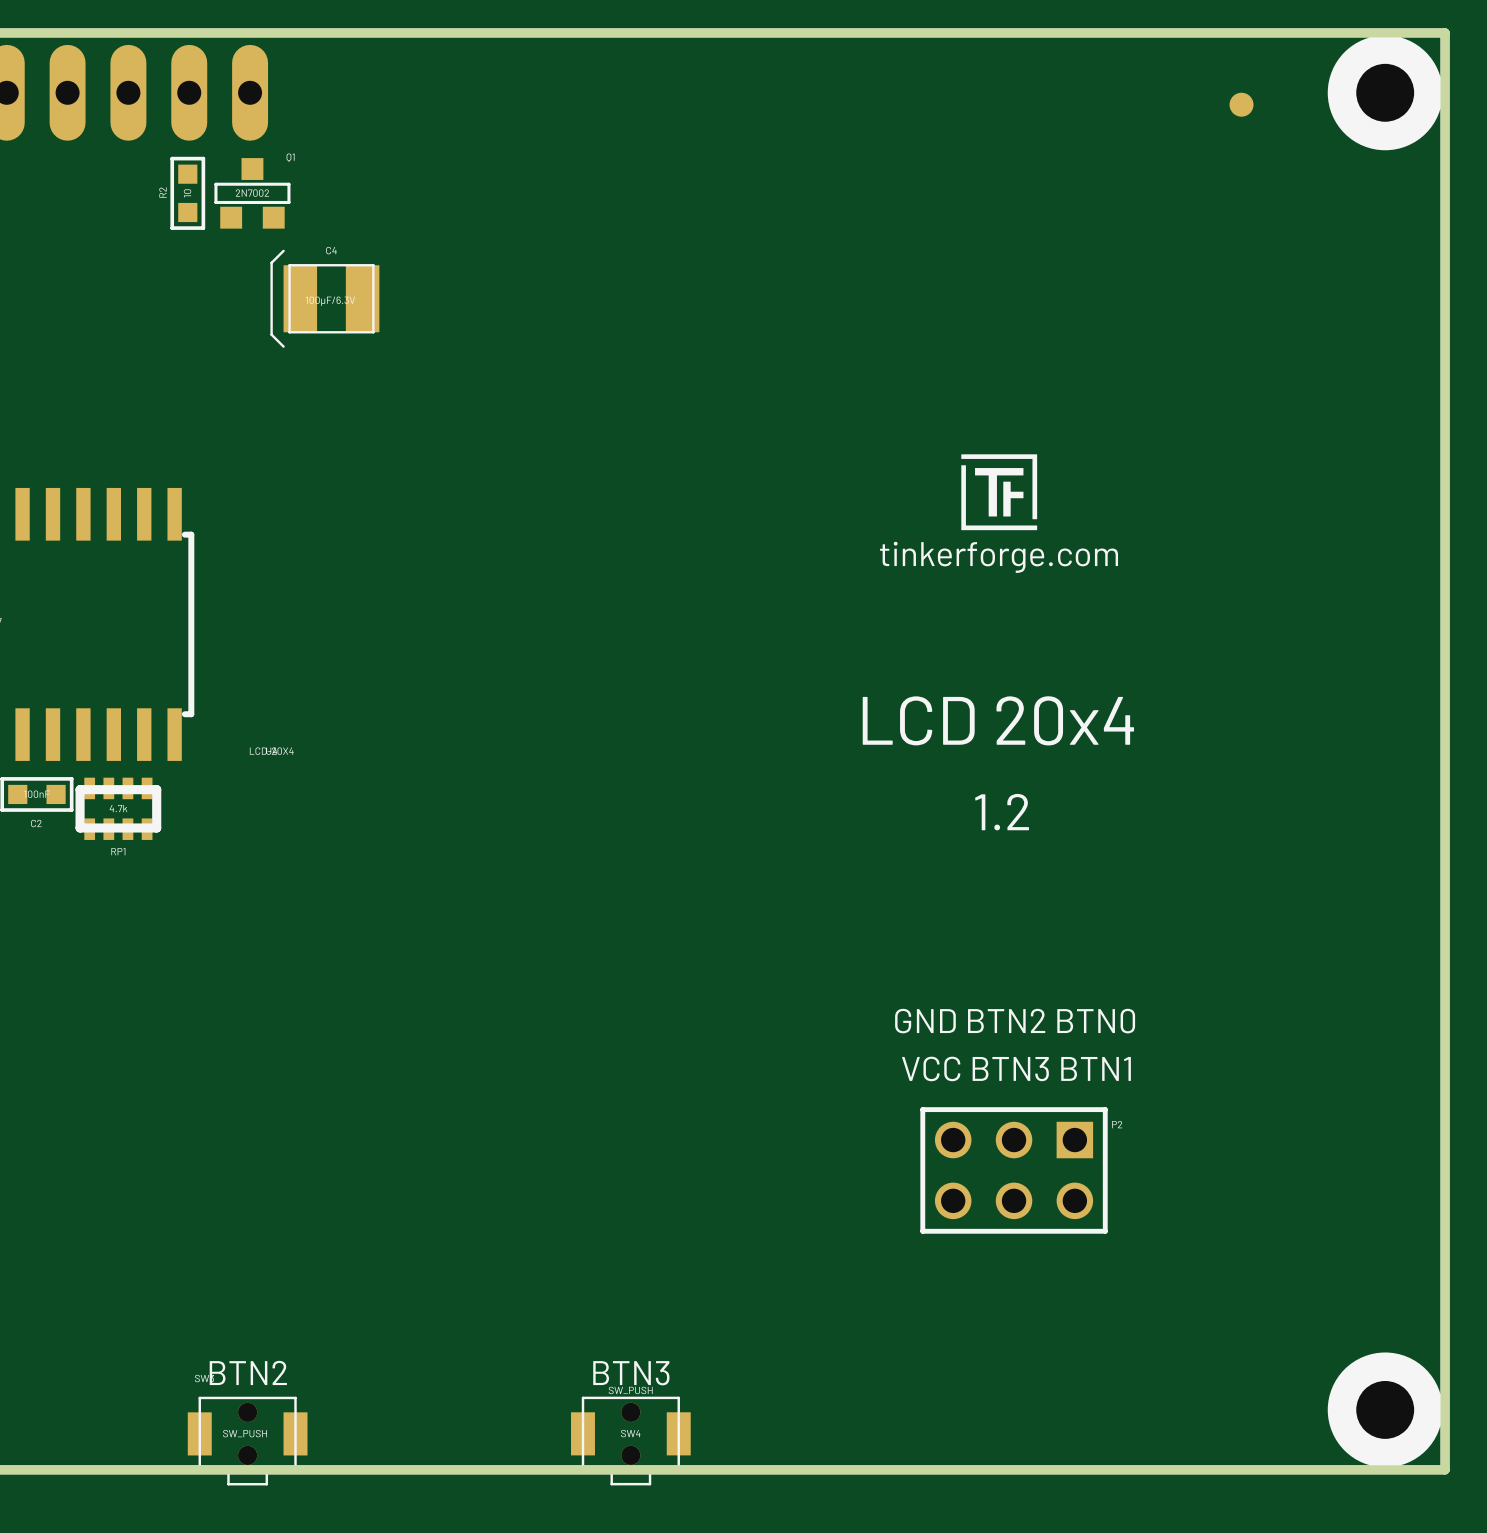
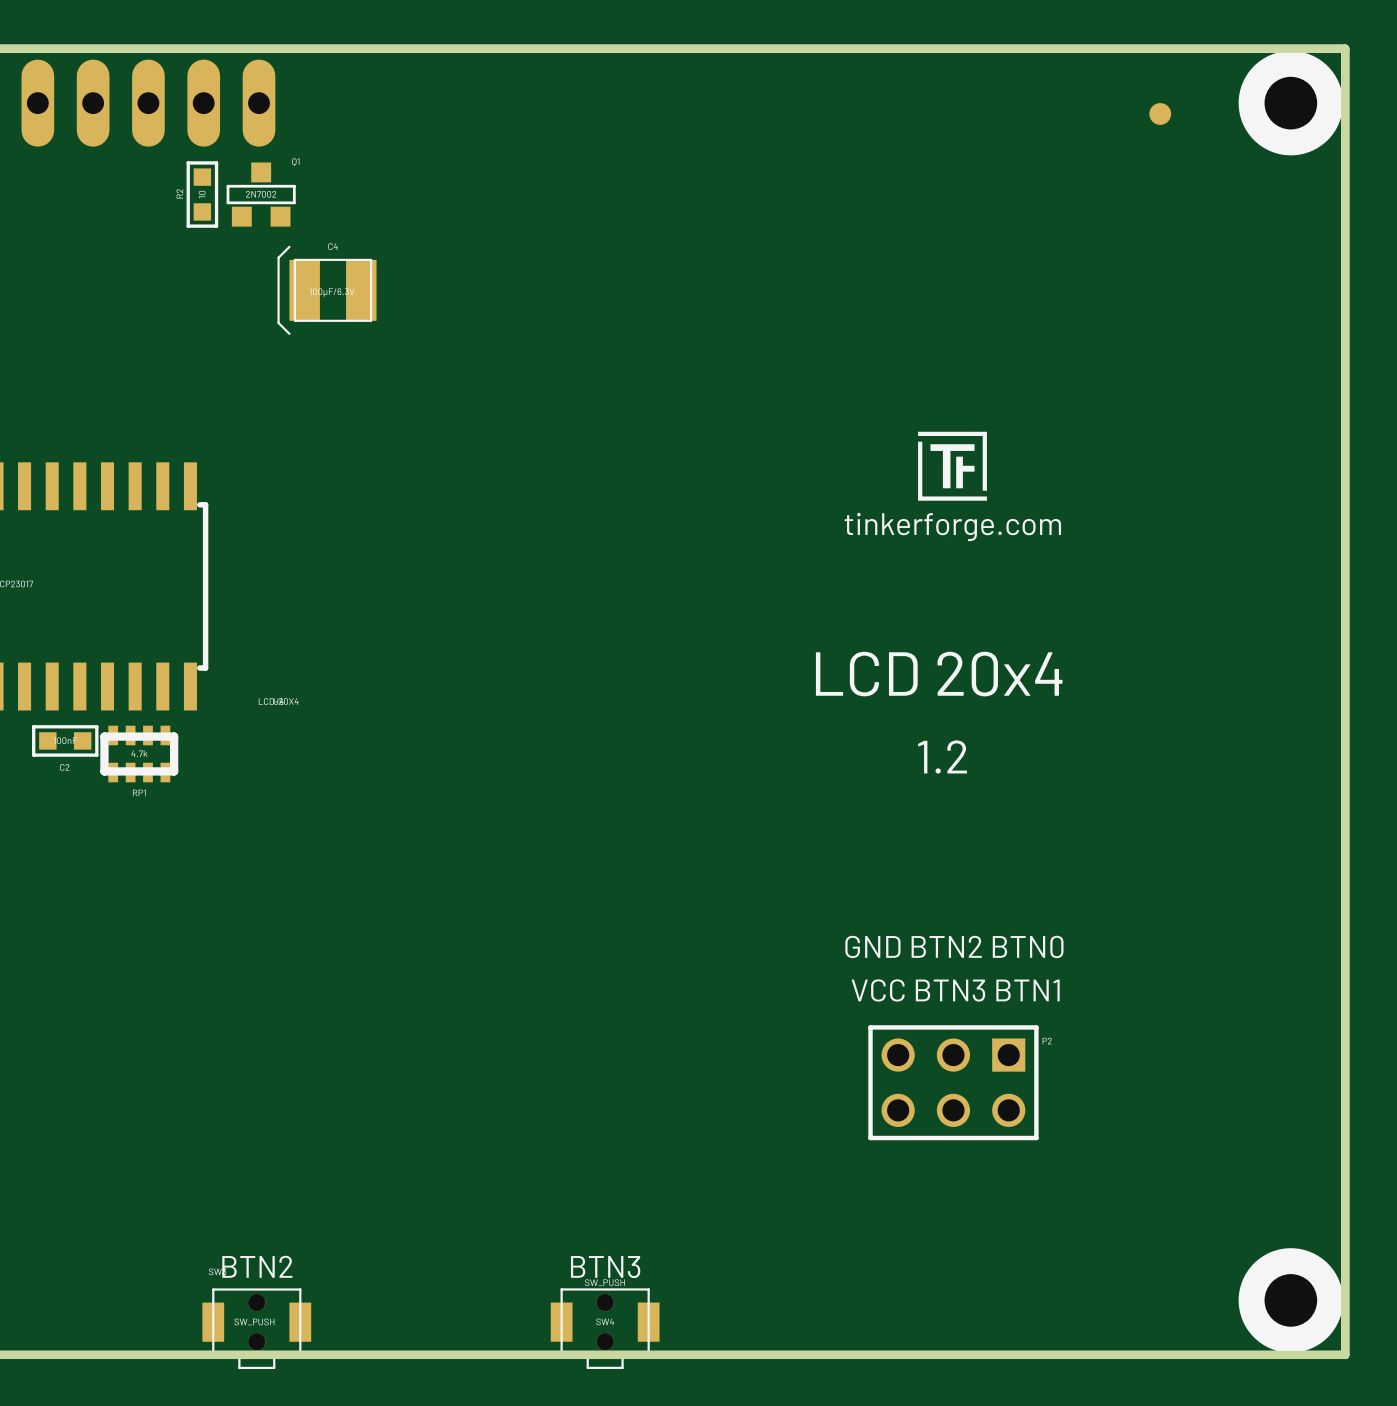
drawing position: (999, 492) -> (952, 466)
text position: tinkerforge.com (999, 557) -> tinkerforge.com (952, 527)

